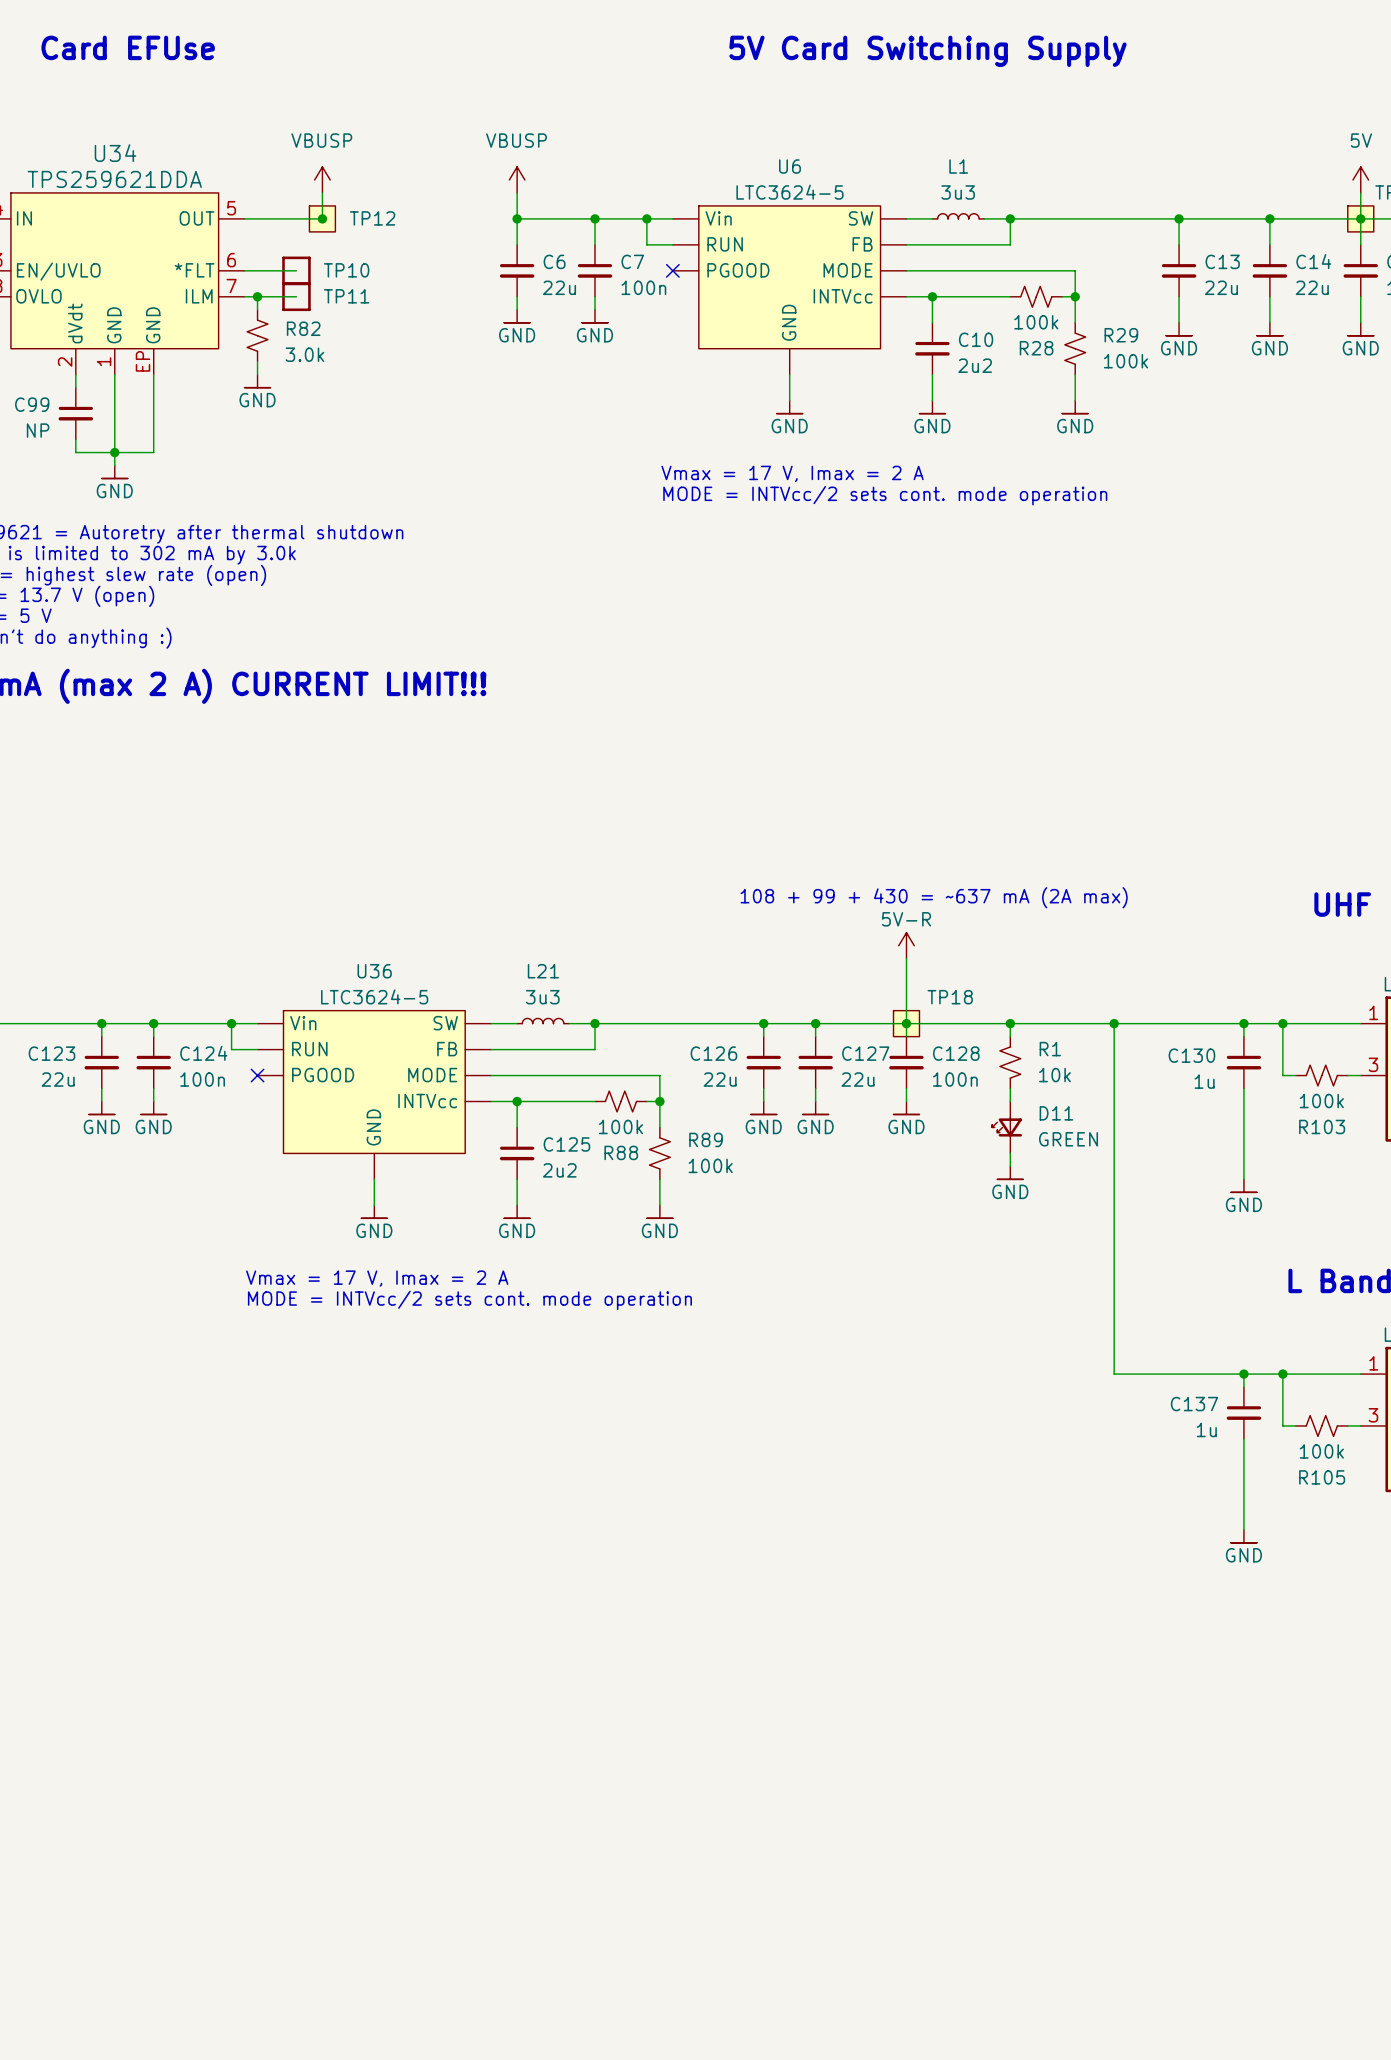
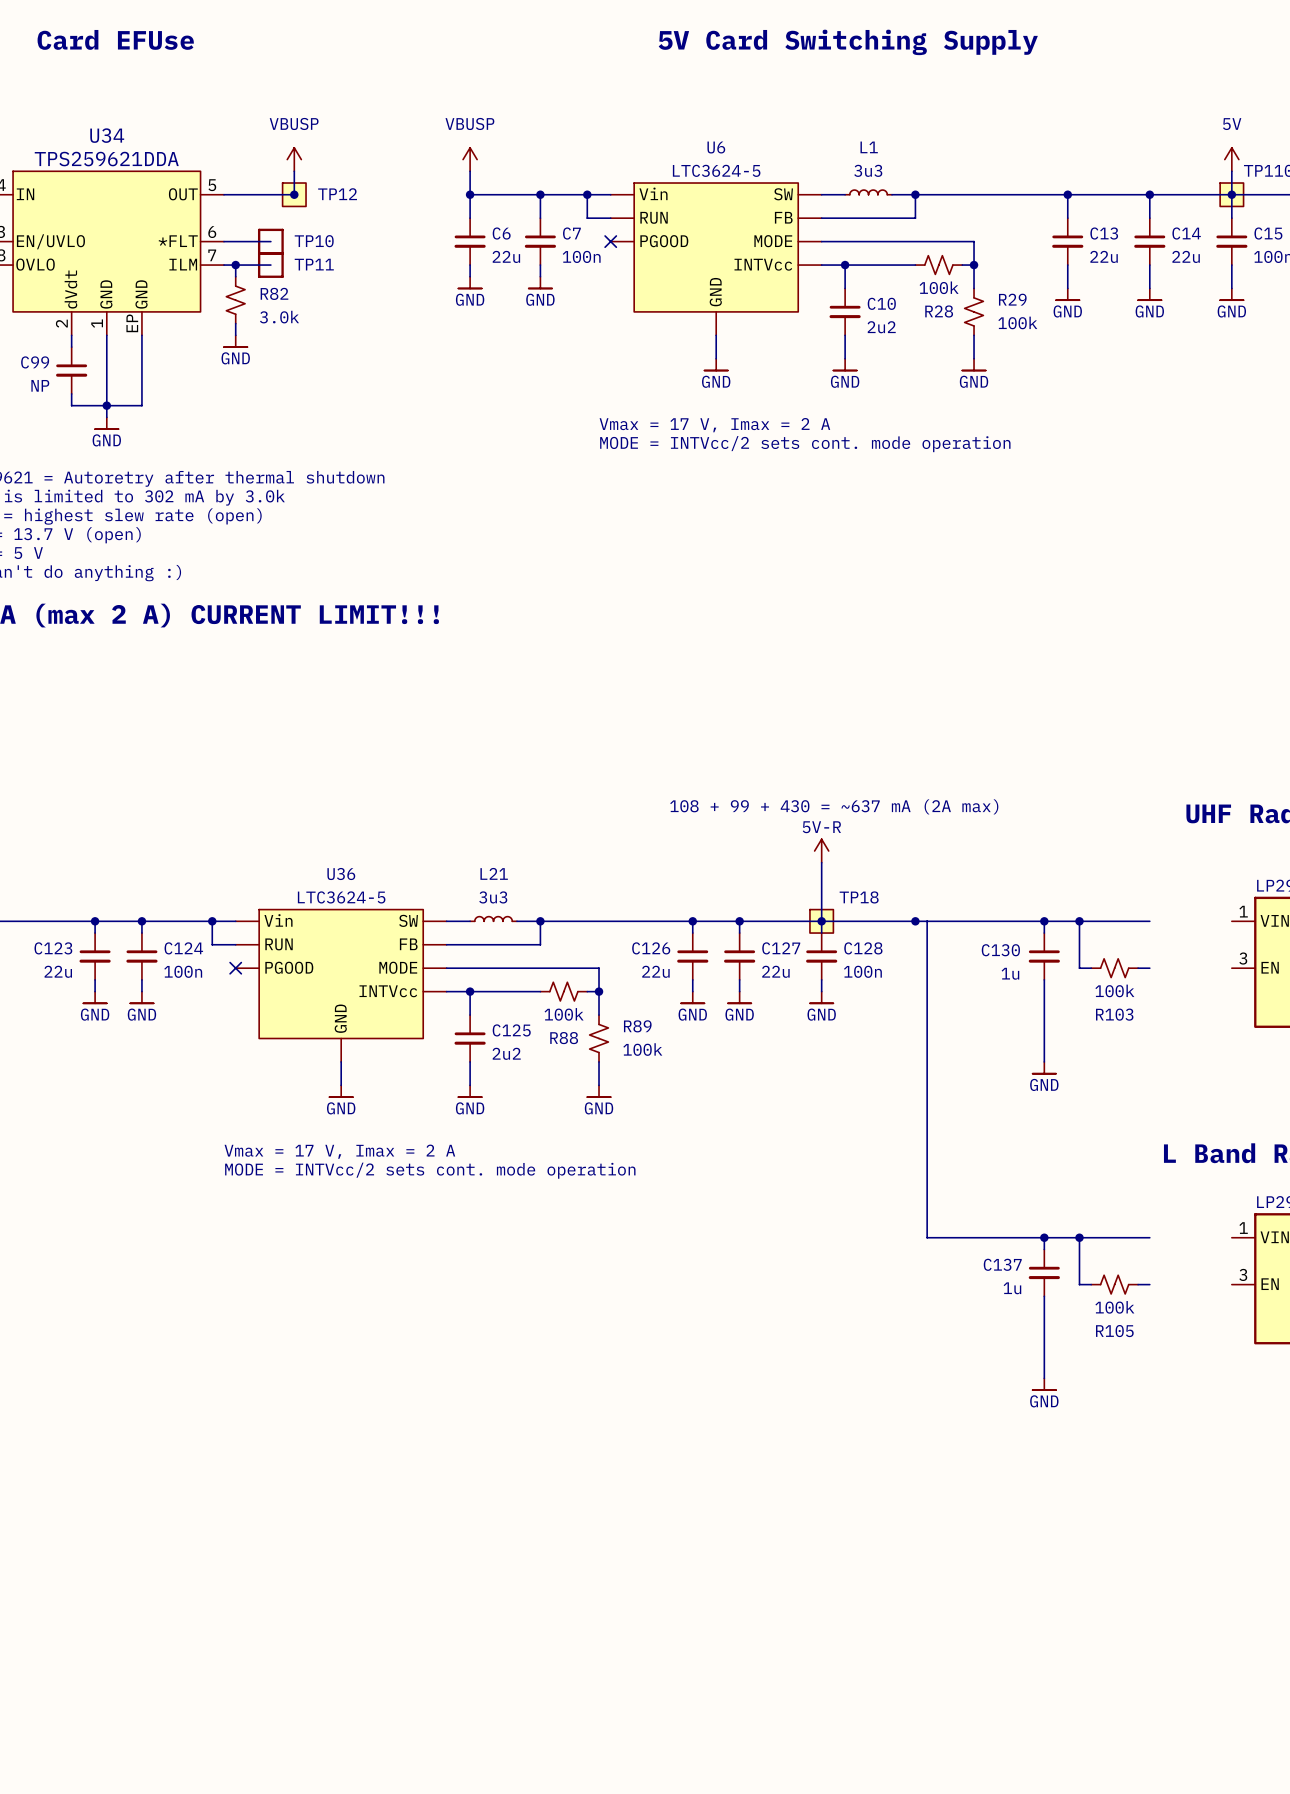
wire: (1010, 1023) (1010, 1036) -> none
wire: (1114, 1023) (1114, 1374) -> (927, 921) (927, 1237) (1009, 1237)
junction: (1114, 1023) -> none
junction: none -> (1044, 921)
junction: none -> (1079, 921)
wire: (1243, 1023) (1243, 1036) -> (1044, 921) (1044, 933)
junction: (1243, 1023) -> none
wire: (1269, 1023) (1360, 1023) -> none
wire: (1282, 1023) (1282, 1075) (1295, 1075) -> (1079, 921) (1079, 968) (1091, 968)
junction: (1282, 1023) -> none
R1: 10k (1010, 1062) -> none
C130 position: (1243, 1062) -> (1044, 956)
R103 position: (1321, 1075) -> (1114, 968)
wire: (1347, 1075) (1360, 1075) -> (1138, 968) (1149, 968)
wire: (1010, 1088) (1010, 1101) -> none
wire: (1243, 1088) (1243, 1179) -> (1044, 979) (1044, 1061)
D11: GREEN (1007, 1127) -> none
wire: (1010, 1153) (1010, 1166) -> none
power symbol: GND (1010, 1172) -> none
power symbol: none -> GND (1044, 1067)
power symbol: GND (1243, 1185) -> none
junction: none -> (1044, 1237)
junction: none -> (1079, 1237)
wire: (1243, 1374) (1243, 1387) -> (1044, 1237) (1044, 1249)
junction: (1243, 1374) -> none
wire: (1269, 1374) (1360, 1374) -> none
wire: (1282, 1374) (1282, 1425) (1295, 1425) -> (1079, 1237) (1079, 1284) (1091, 1284)
junction: (1282, 1374) -> none
C137 position: (1243, 1413) -> (1044, 1272)
R105 position: (1321, 1425) -> (1114, 1284)
wire: (1347, 1425) (1360, 1425) -> (1138, 1284) (1149, 1284)
wire: (1243, 1438) (1243, 1529) -> (1044, 1296) (1044, 1378)
power symbol position: GND (1243, 1536) -> GND (1044, 1384)

